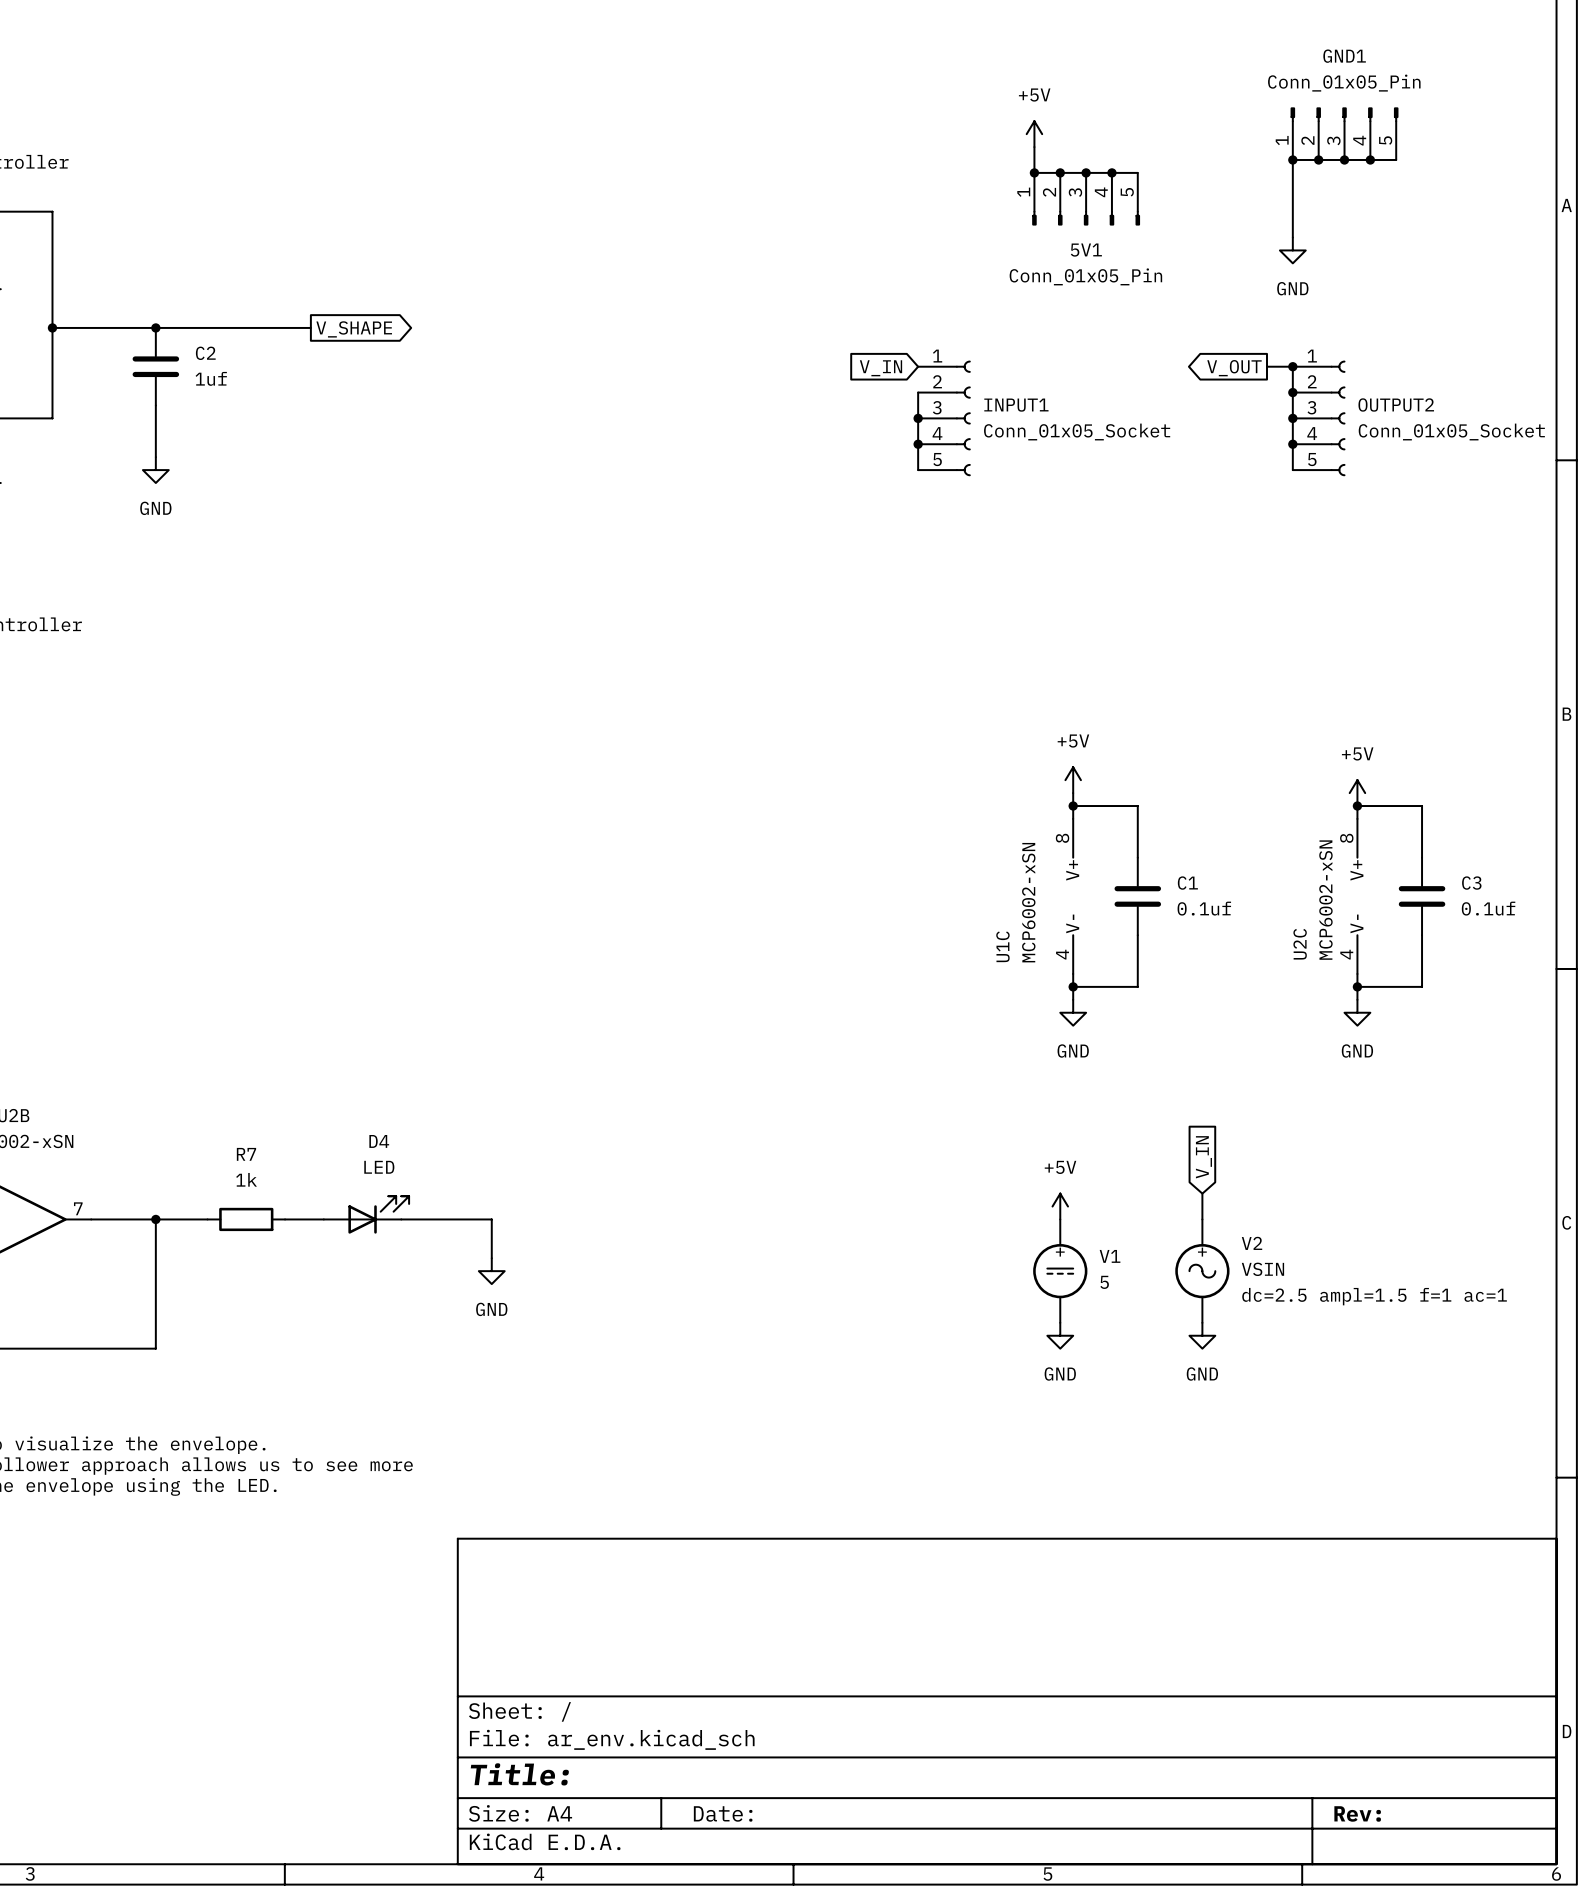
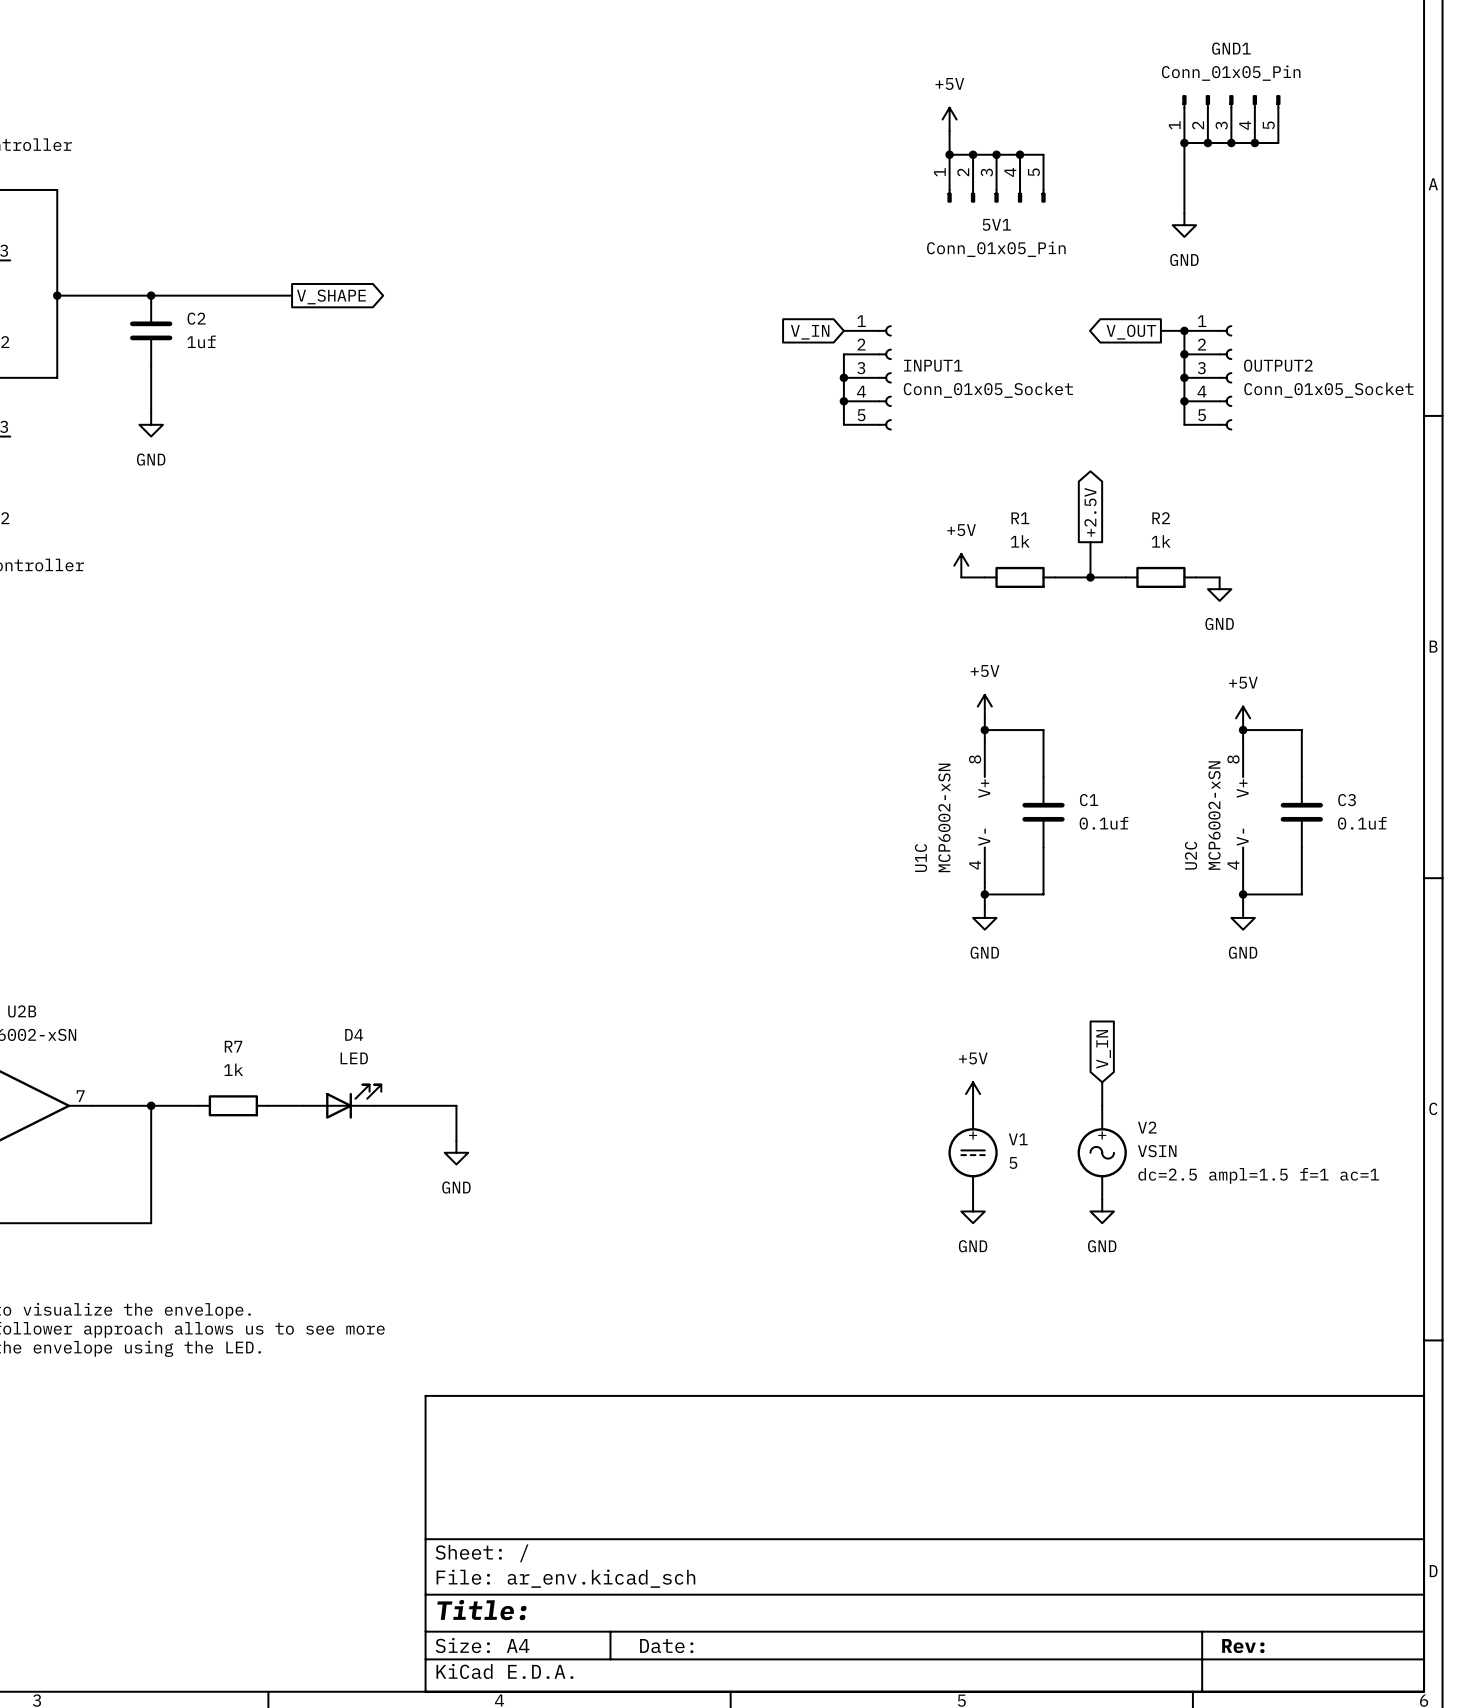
global label: none -> +2.5V (1090, 512)
wire: none -> (1090, 542) (1090, 577)
power symbol: none -> +5V (961, 565)
wire: none -> (961, 577) (984, 577)
R1: none -> 1k (1020, 577)
wire: none -> (1055, 577) (1125, 577)
junction: none -> (1090, 577)
R2: none -> 1k (1160, 577)
wire: none -> (1196, 577) (1219, 577)
power symbol: none -> GND (1219, 589)

